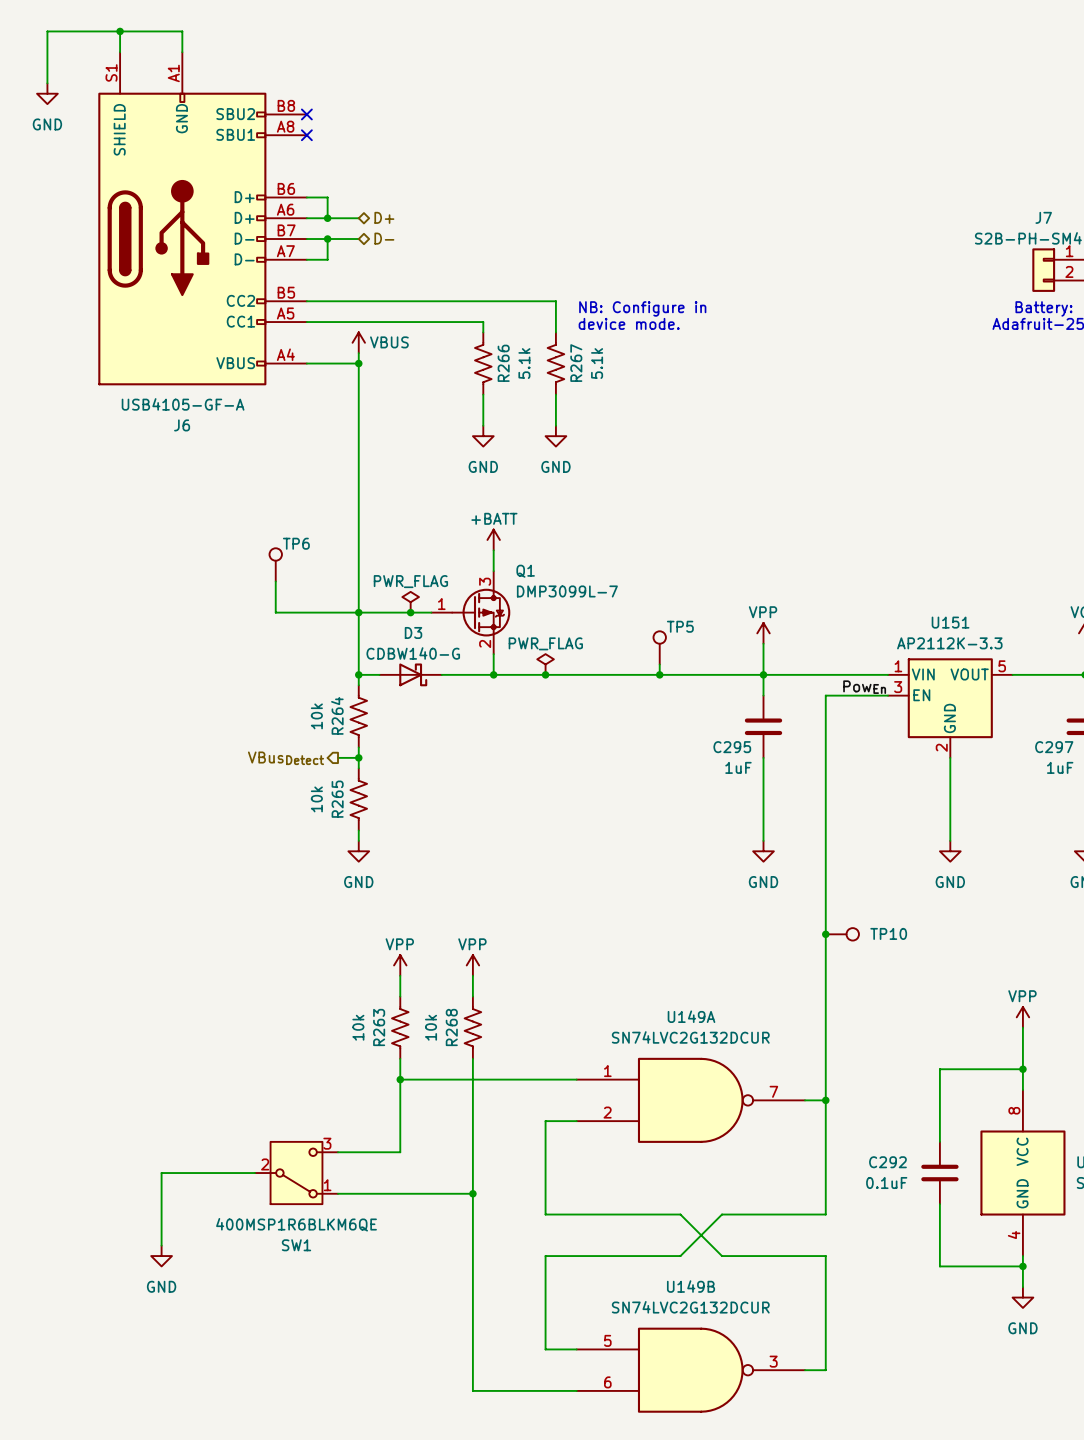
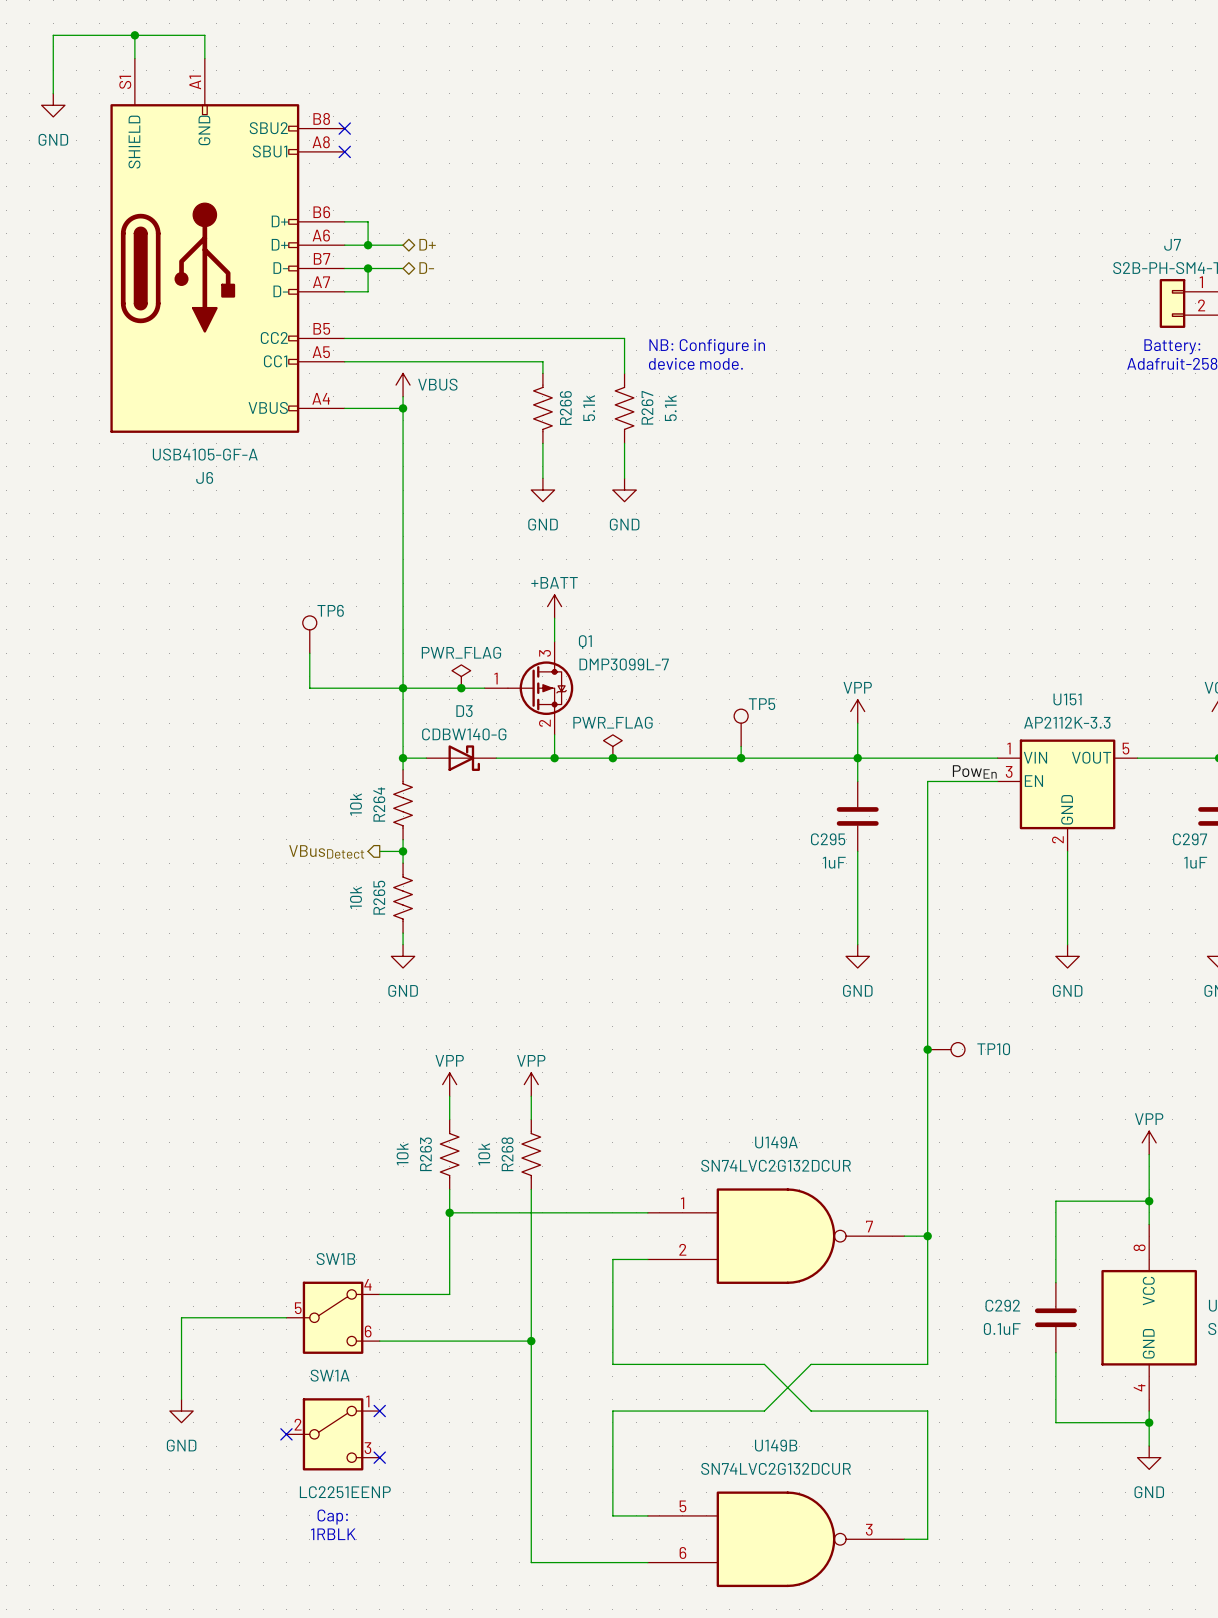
SW1: 400MSP1R6BLKM6QE (296, 1173) -> none
SW1B: none -> LC2251EENP (333, 1317)
no-connect mark: none -> (379, 1411)
no-connect mark: none -> (286, 1434)
SW1A: none -> (333, 1434)
no-connect mark: none -> (379, 1457)
text: none -> Cap: (332, 1517)
text: none -> 1RBLK (333, 1534)

